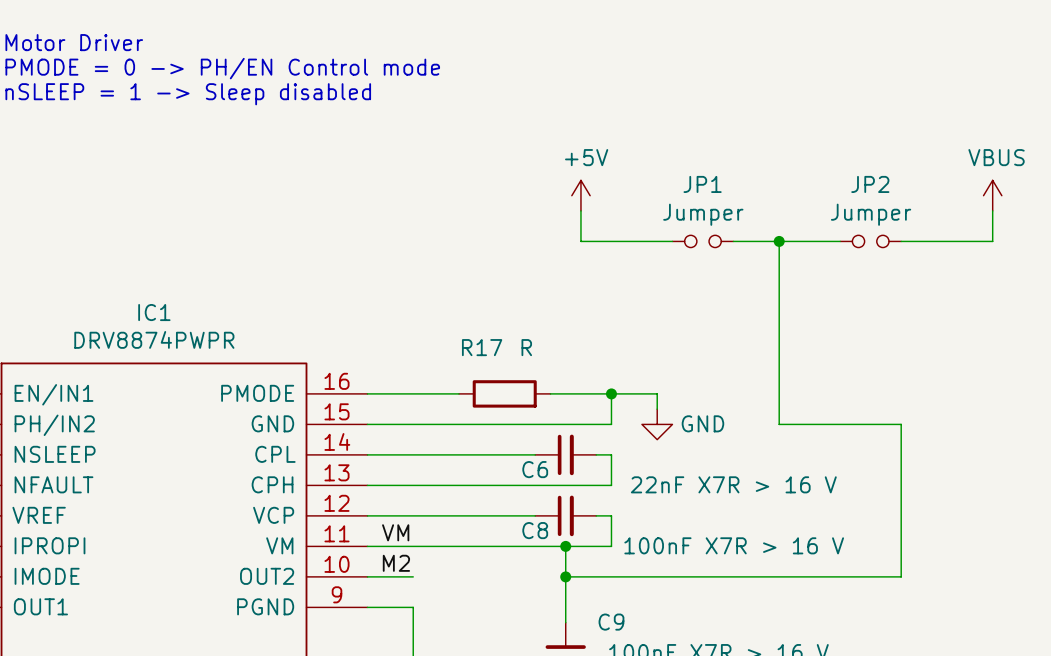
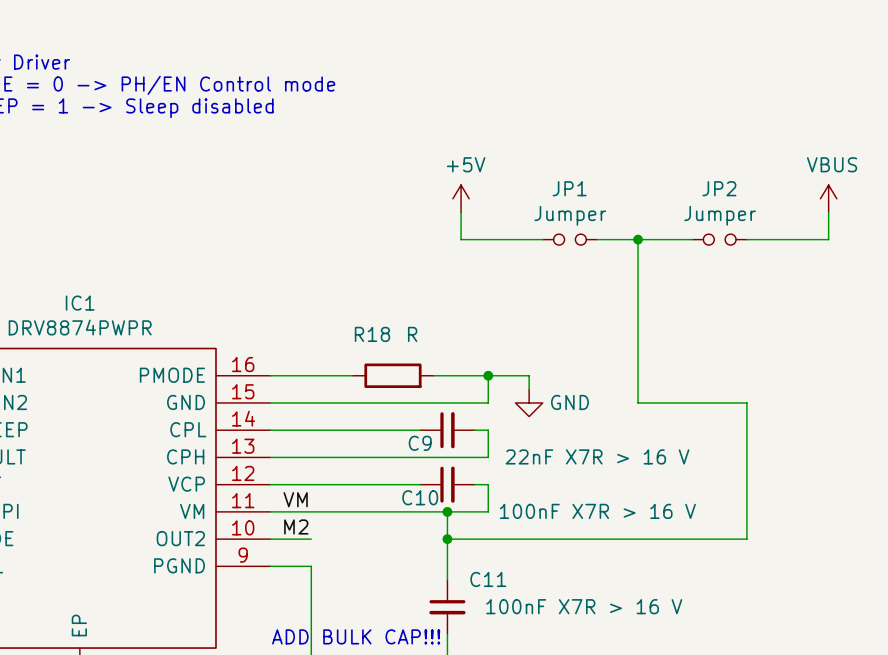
R17 name: R17 (482, 347) -> R18 (372, 334)
C6 name: C6 (535, 469) -> C9 (420, 443)
C8 name: C8 (535, 530) -> C10 (420, 497)
C9 name: C9 (611, 622) -> C11 (488, 579)

